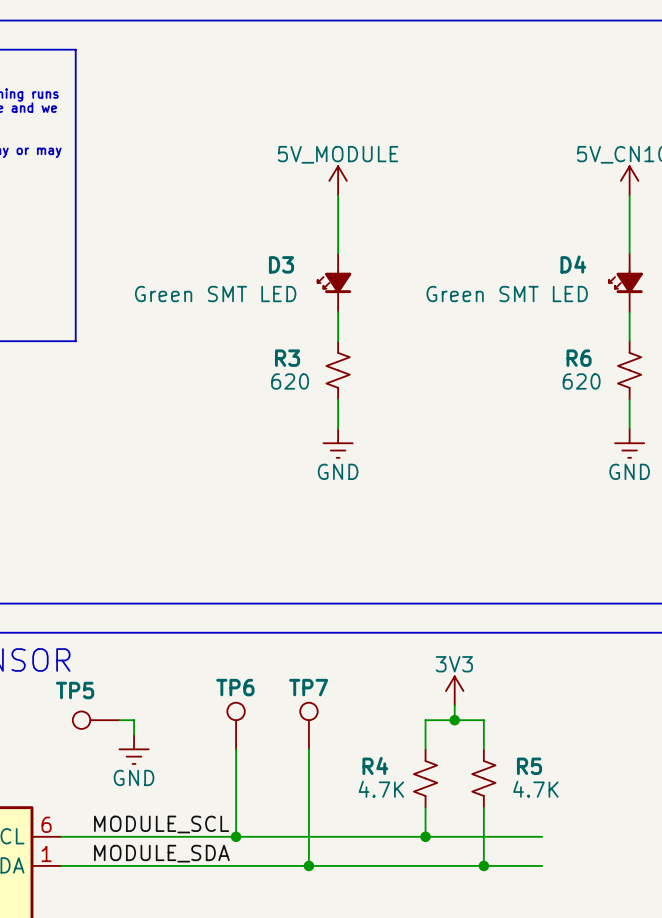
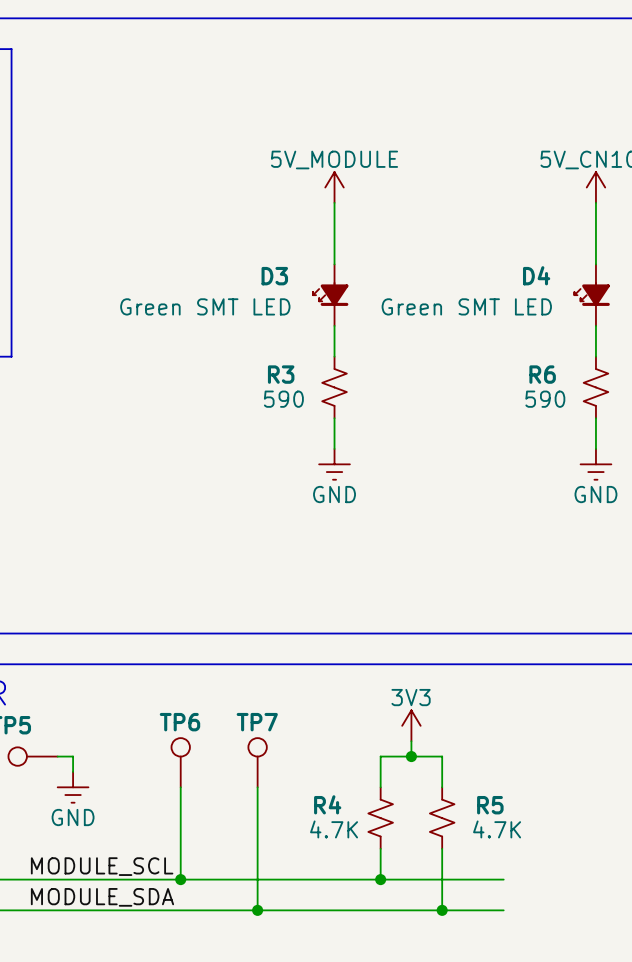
power symbol position: 5V_MODULE (338, 180) -> 5V_MODULE (334, 187)
wire: (338, 195) (338, 253) -> (334, 202) (334, 264)
D3 position: (334, 282) -> (330, 295)
wire: (338, 312) (338, 341) -> (334, 325) (334, 356)
R3 position: (338, 370) -> (334, 387)
R3 value: 620 (290, 381) -> 590 (283, 399)
R6 value: 620 (581, 381) -> 590 (545, 399)
wire: (338, 399) (338, 428) -> (334, 418) (334, 448)
power symbol position: GND (338, 443) -> GND (334, 464)

